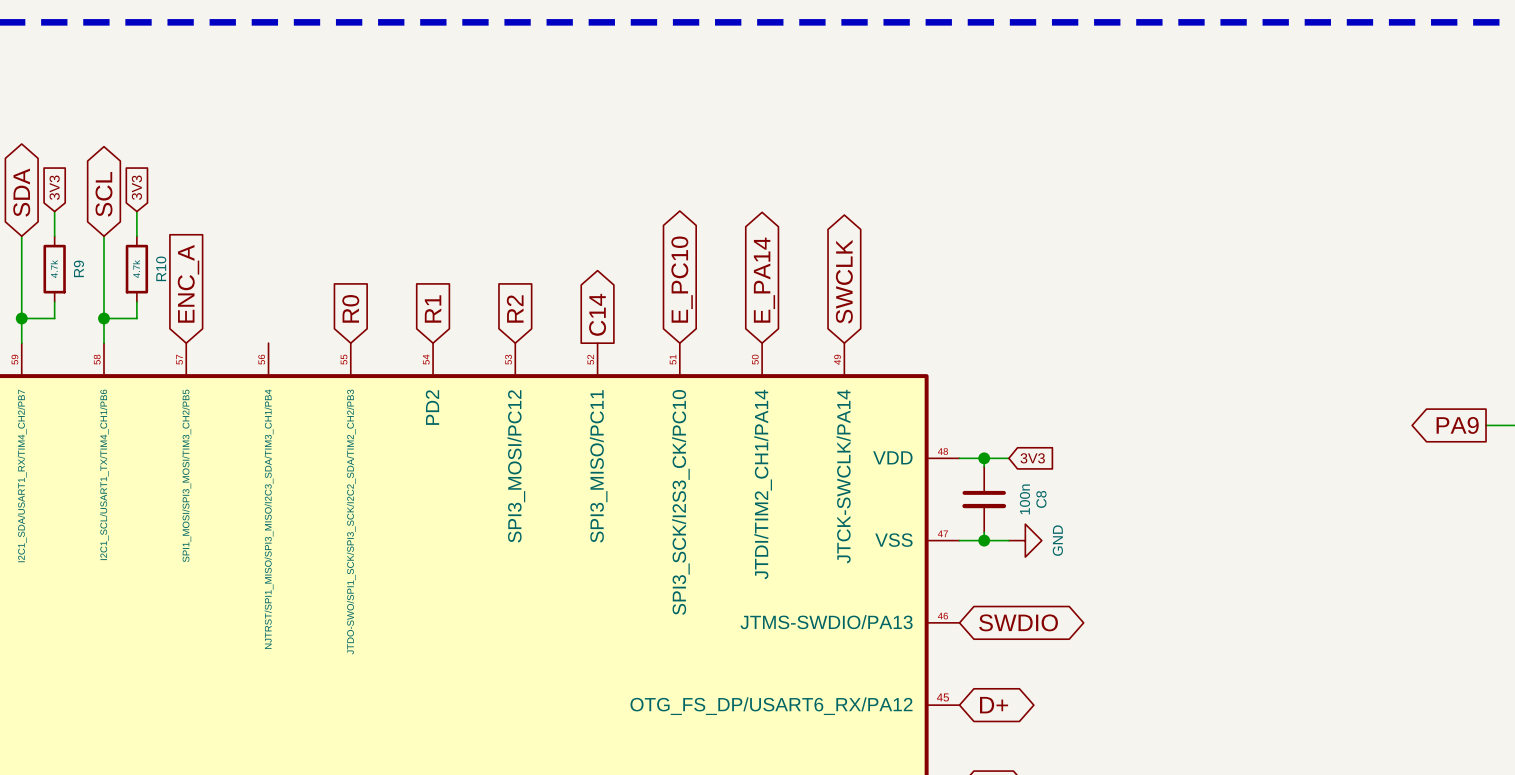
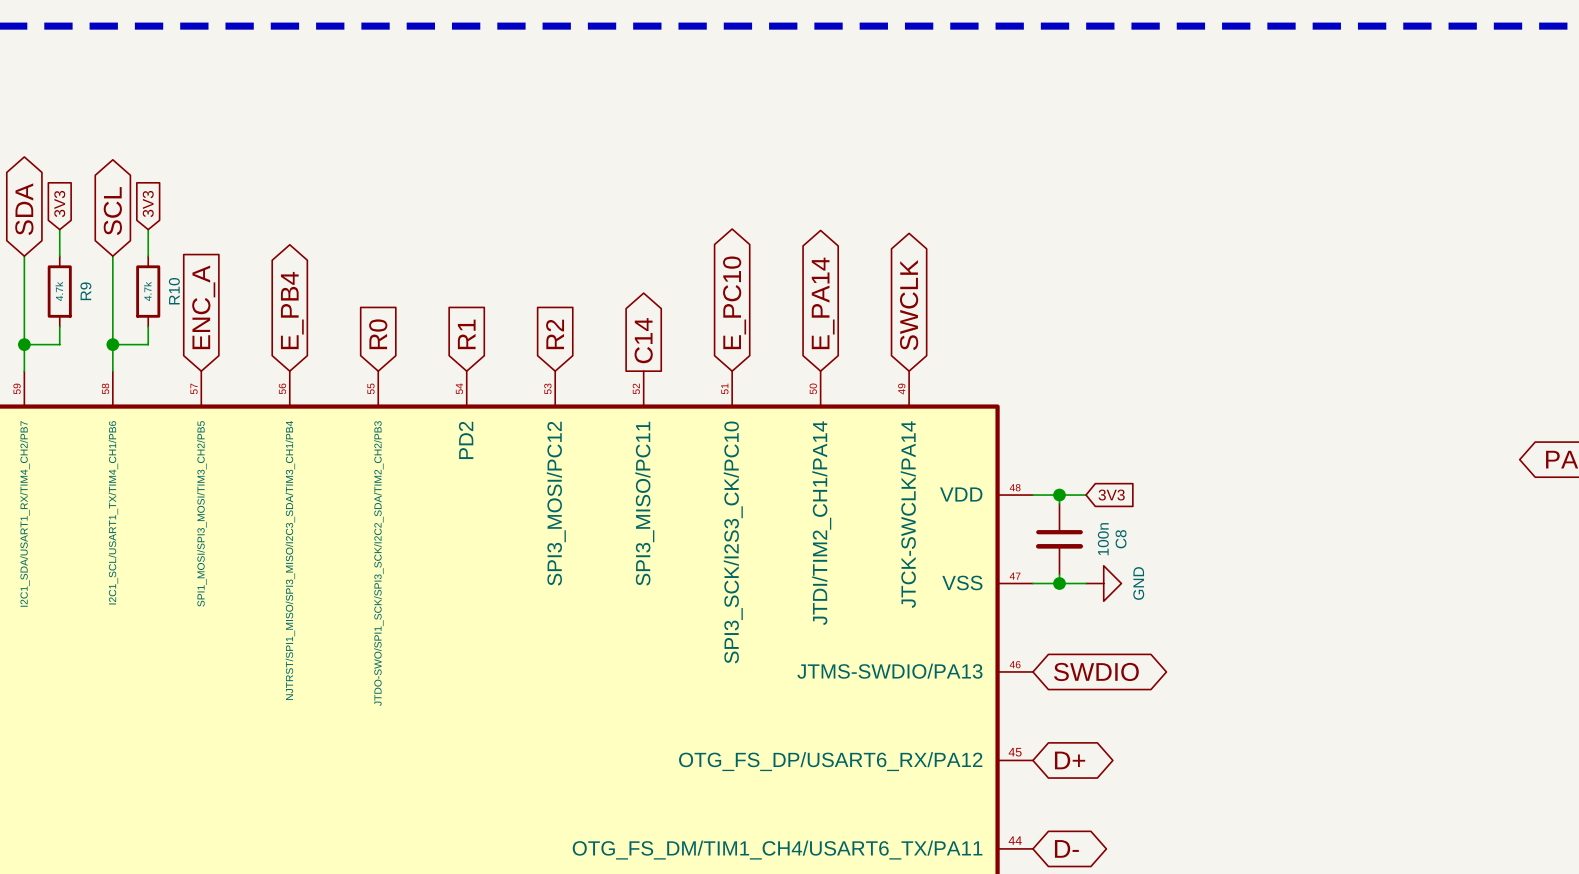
global label: none -> E_PB4 (292, 310)

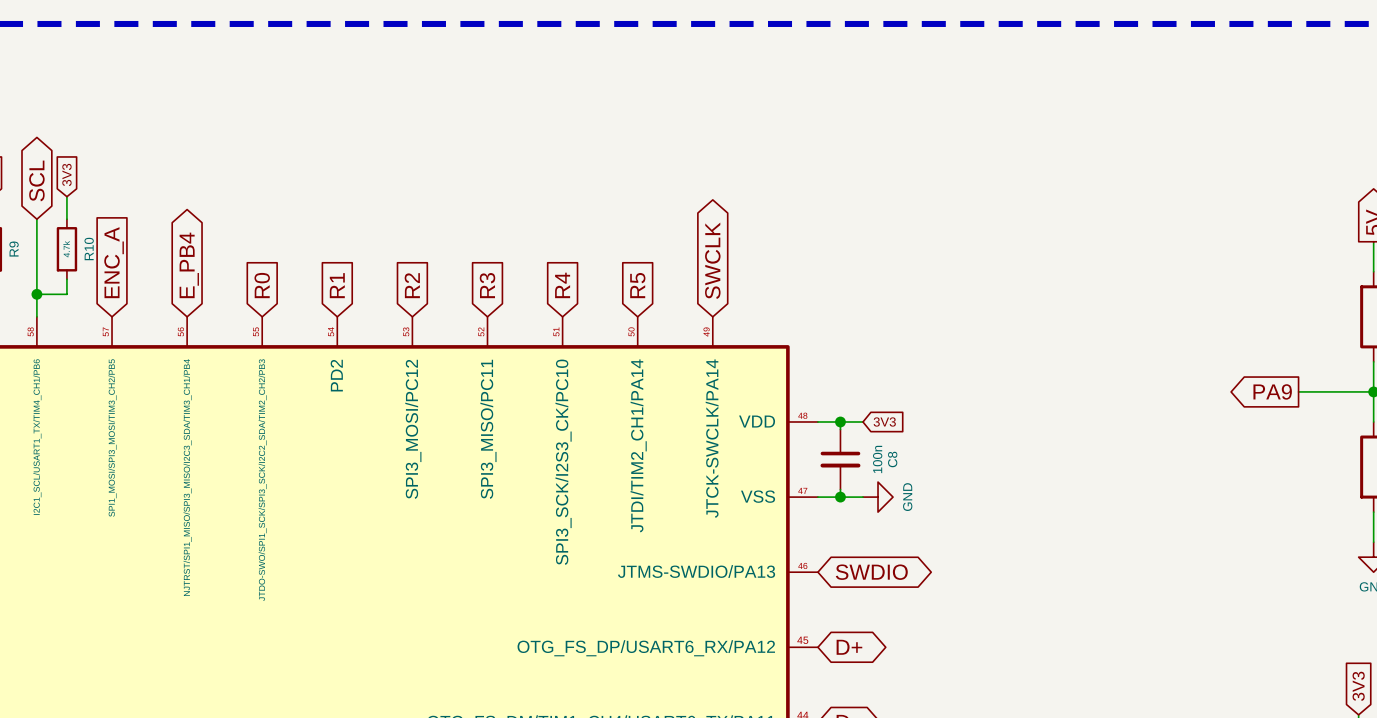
global label shape: bidirectional (734, 302) -> input (562, 285)
global label: E_PC10 (734, 302) -> R4 (562, 285)
global label shape: bidirectional (823, 303) -> input (637, 285)
global label: E_PA14 (823, 303) -> R5 (637, 285)
global label shape: output (643, 340) -> input (487, 285)
global label: C14 (643, 340) -> R3 (487, 285)

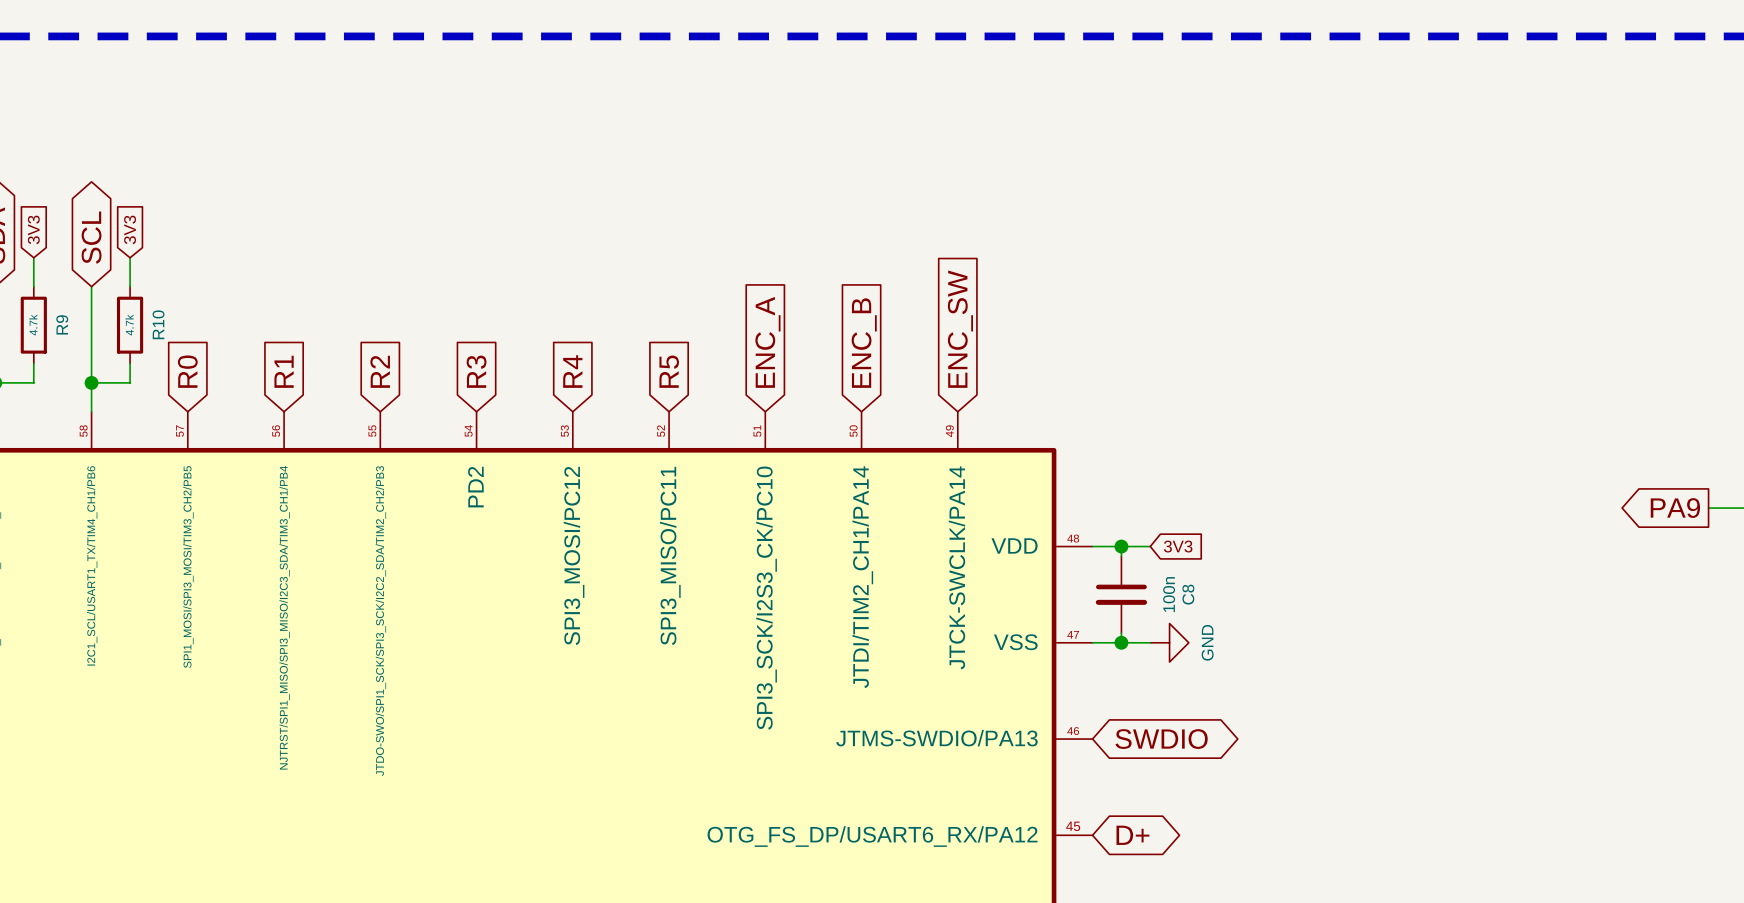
global label shape: bidirectional (712, 260) -> input (960, 329)
global label: SWCLK (712, 260) -> ENC_SW (960, 329)
global label: ENC_A (114, 262) -> R0 (187, 371)
global label shape: bidirectional (189, 265) -> input (284, 371)
global label: E_PB4 (189, 265) -> R1 (284, 371)
global label: R0 (262, 285) -> R2 (380, 371)
global label: R1 (337, 285) -> R3 (476, 371)
global label: R2 (412, 285) -> R4 (572, 371)
global label: R3 (487, 285) -> R5 (669, 371)
global label: R4 (562, 285) -> ENC_A (767, 342)
global label: R5 (637, 285) -> ENC_B (864, 343)

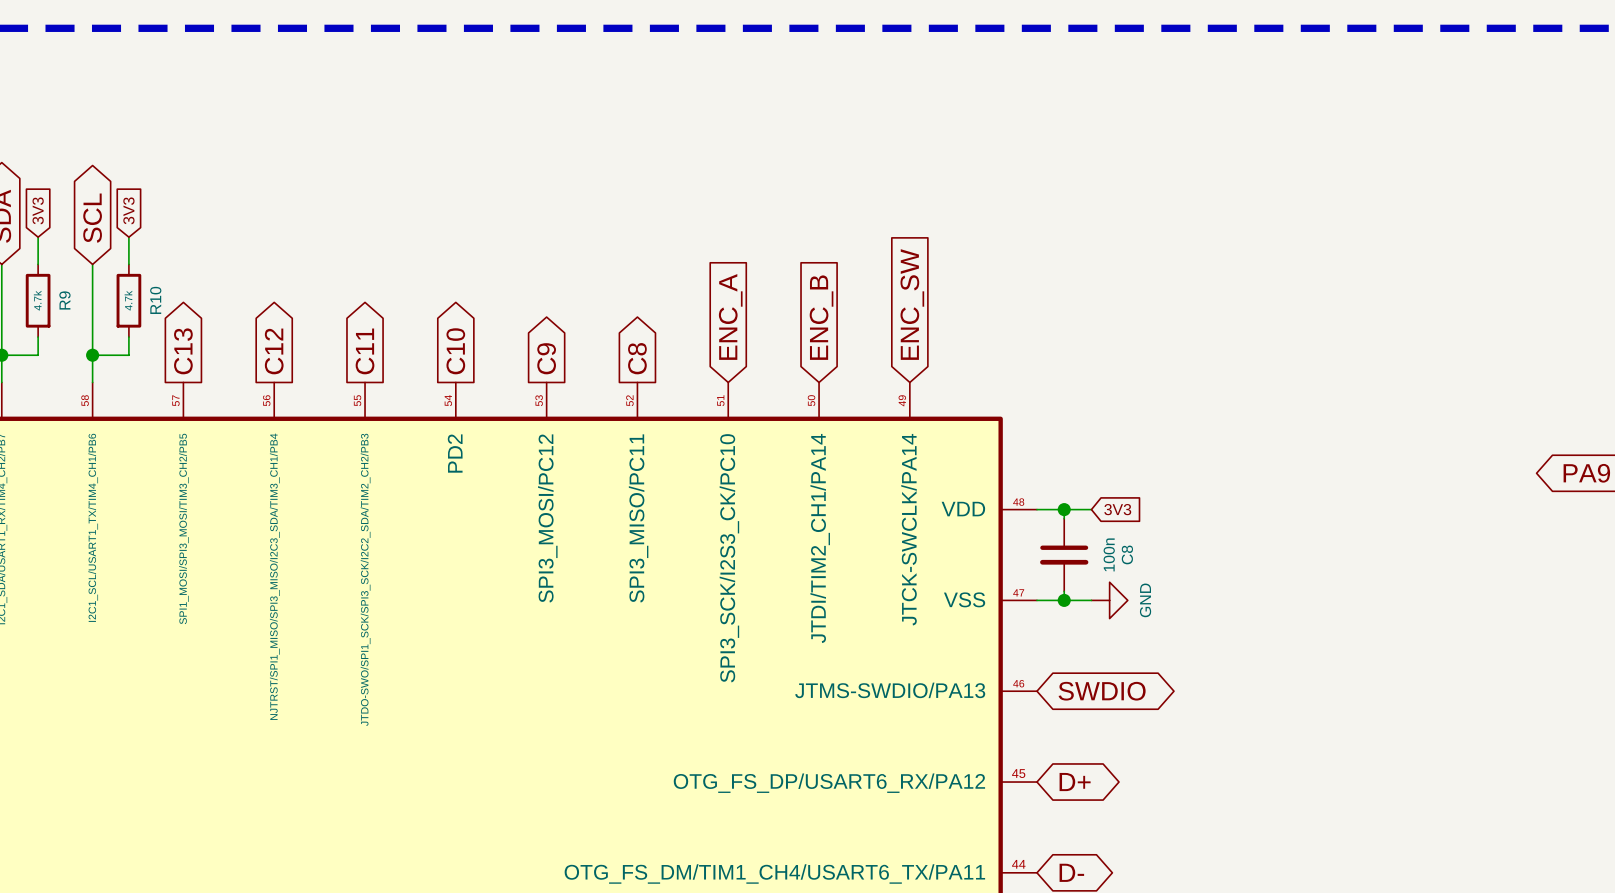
global label shape: input (187, 371) -> output (183, 351)
global label: R0 (187, 371) -> C13 (183, 351)
global label shape: input (284, 371) -> output (274, 351)
global label: R1 (284, 371) -> C12 (274, 351)
global label shape: input (380, 371) -> output (365, 351)
global label: R2 (380, 371) -> C11 (365, 351)
global label shape: input (476, 371) -> output (455, 351)
global label: R3 (476, 371) -> C10 (455, 351)
global label shape: input (572, 371) -> output (546, 358)
global label: R4 (572, 371) -> C9 (546, 358)
global label shape: input (669, 371) -> output (637, 358)
global label: R5 (669, 371) -> C8 (637, 358)

